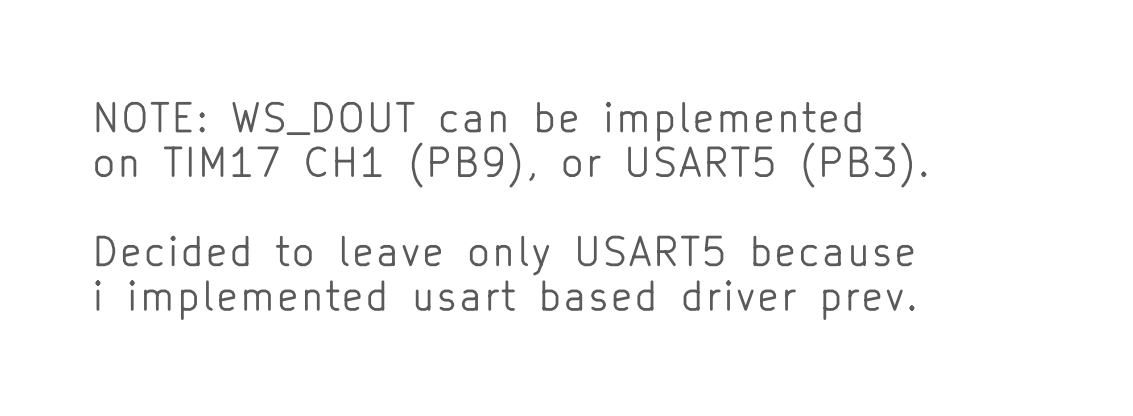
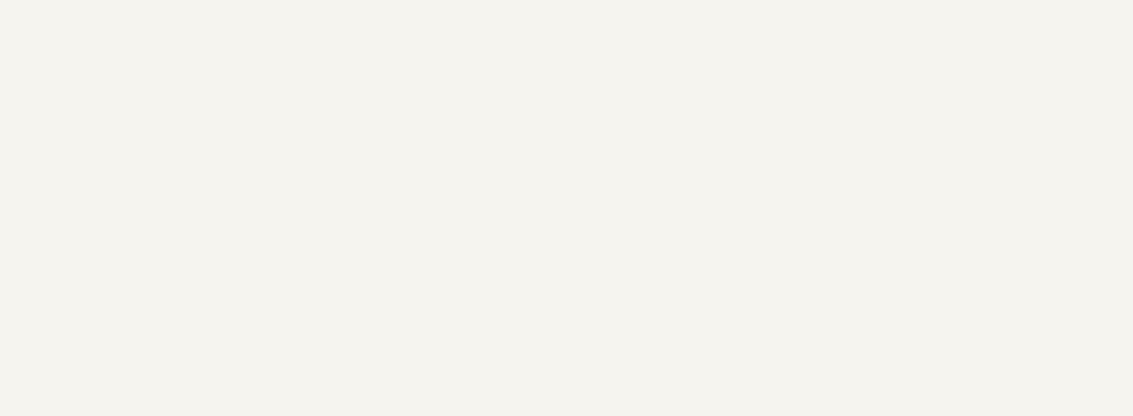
text: NOTE: WS_DOUT can be implemented (478, 121) -> none
text: on TIM17 CH1 (PB9), or USART5 (PB3). (510, 165) -> none
text: Decided to leave only USART5 because (504, 255) -> none
text: i implemented usart based driver prev. (504, 300) -> none

